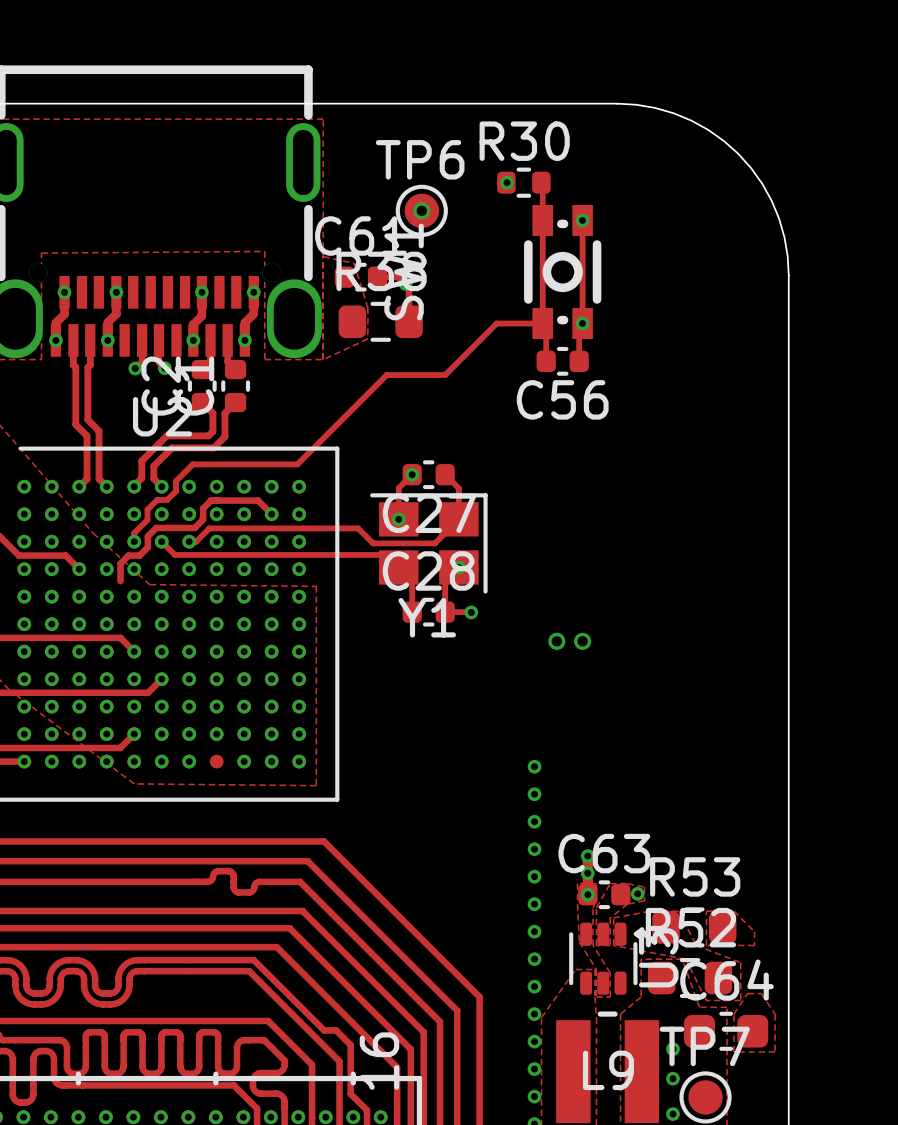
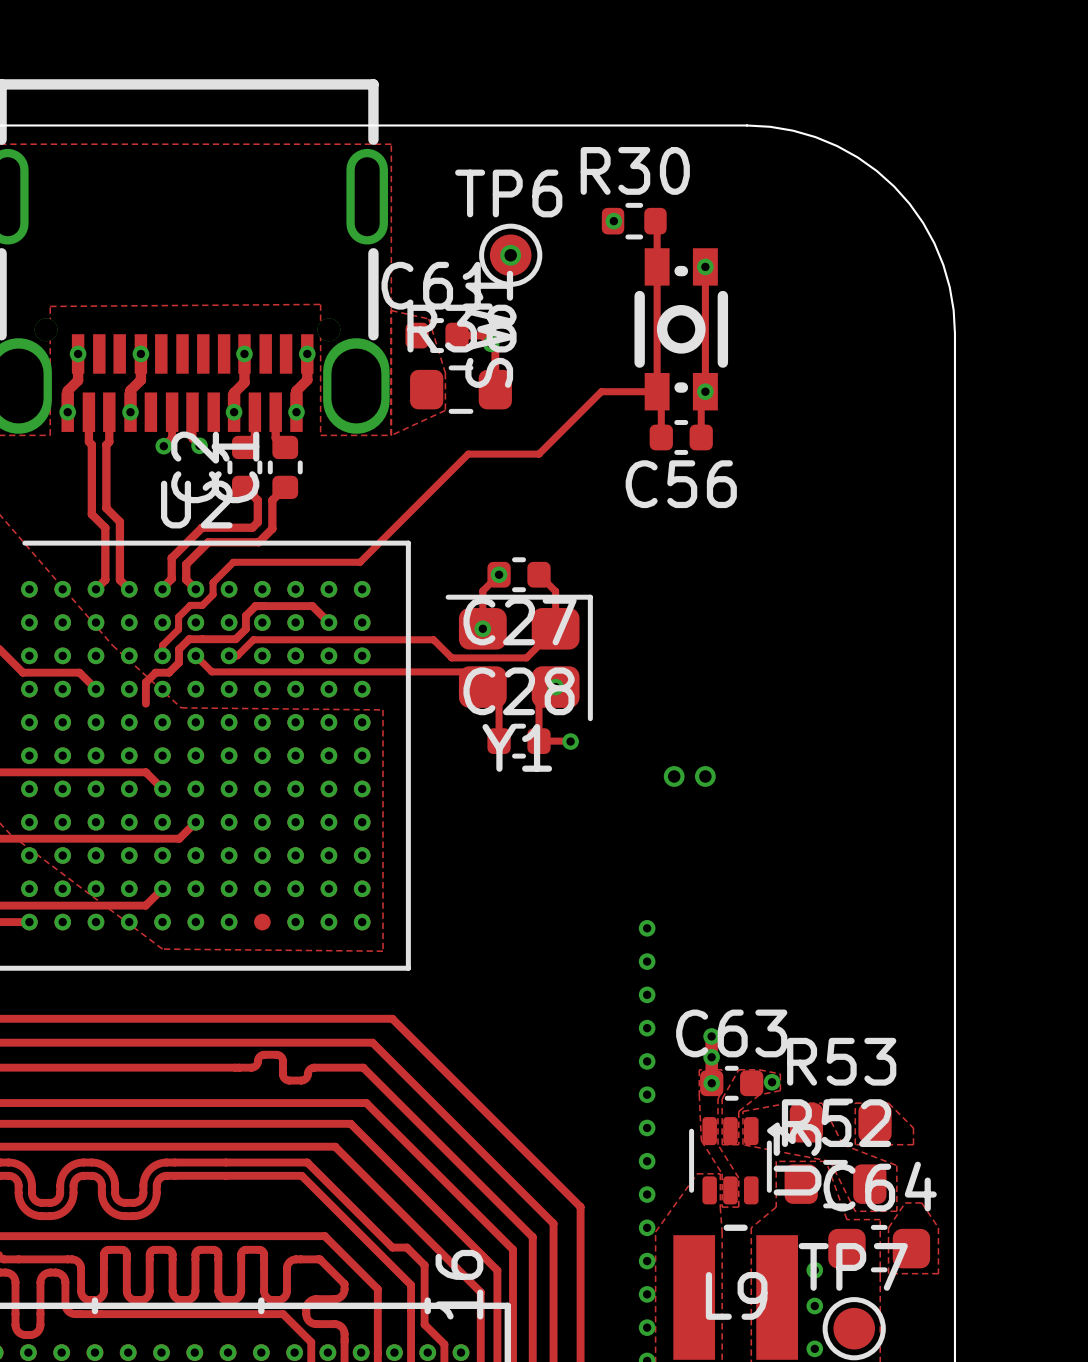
Y1 footprint: [370, 493, 488, 594] -> [445, 594, 593, 722]

